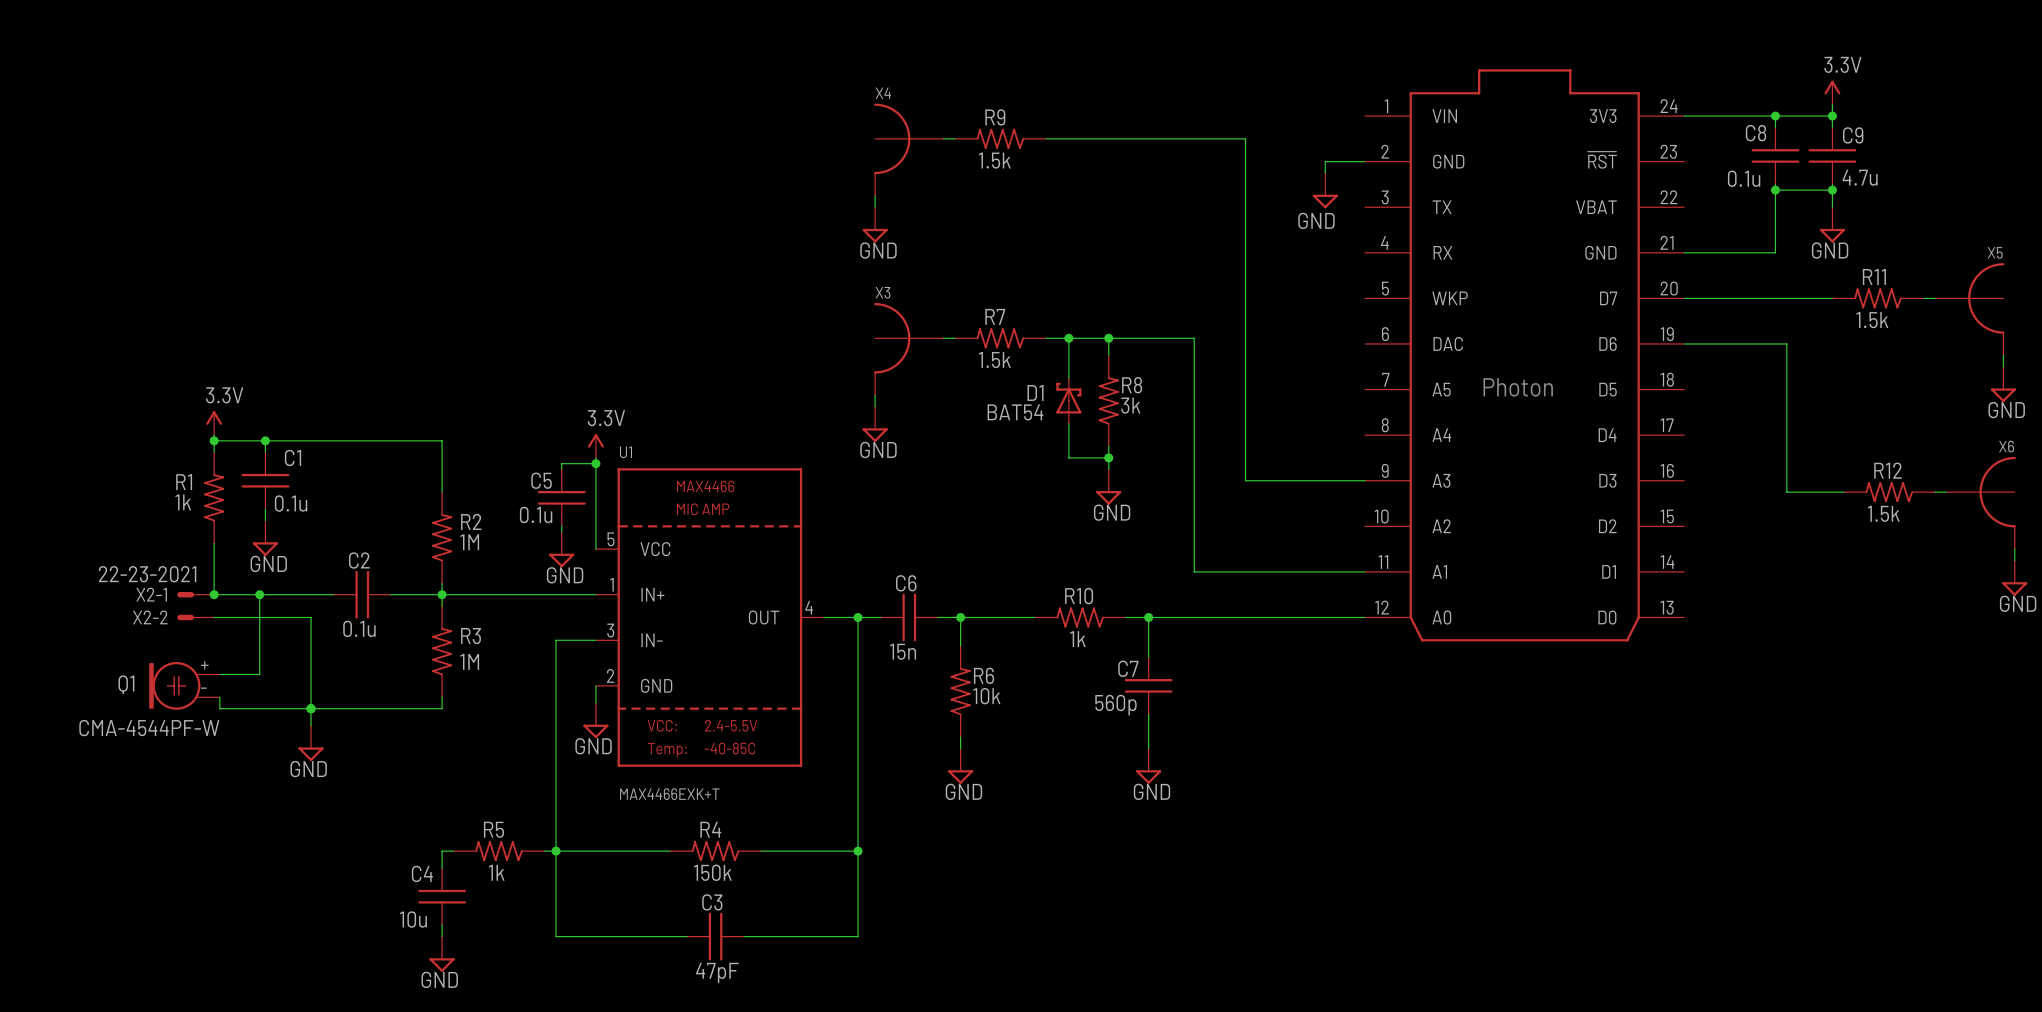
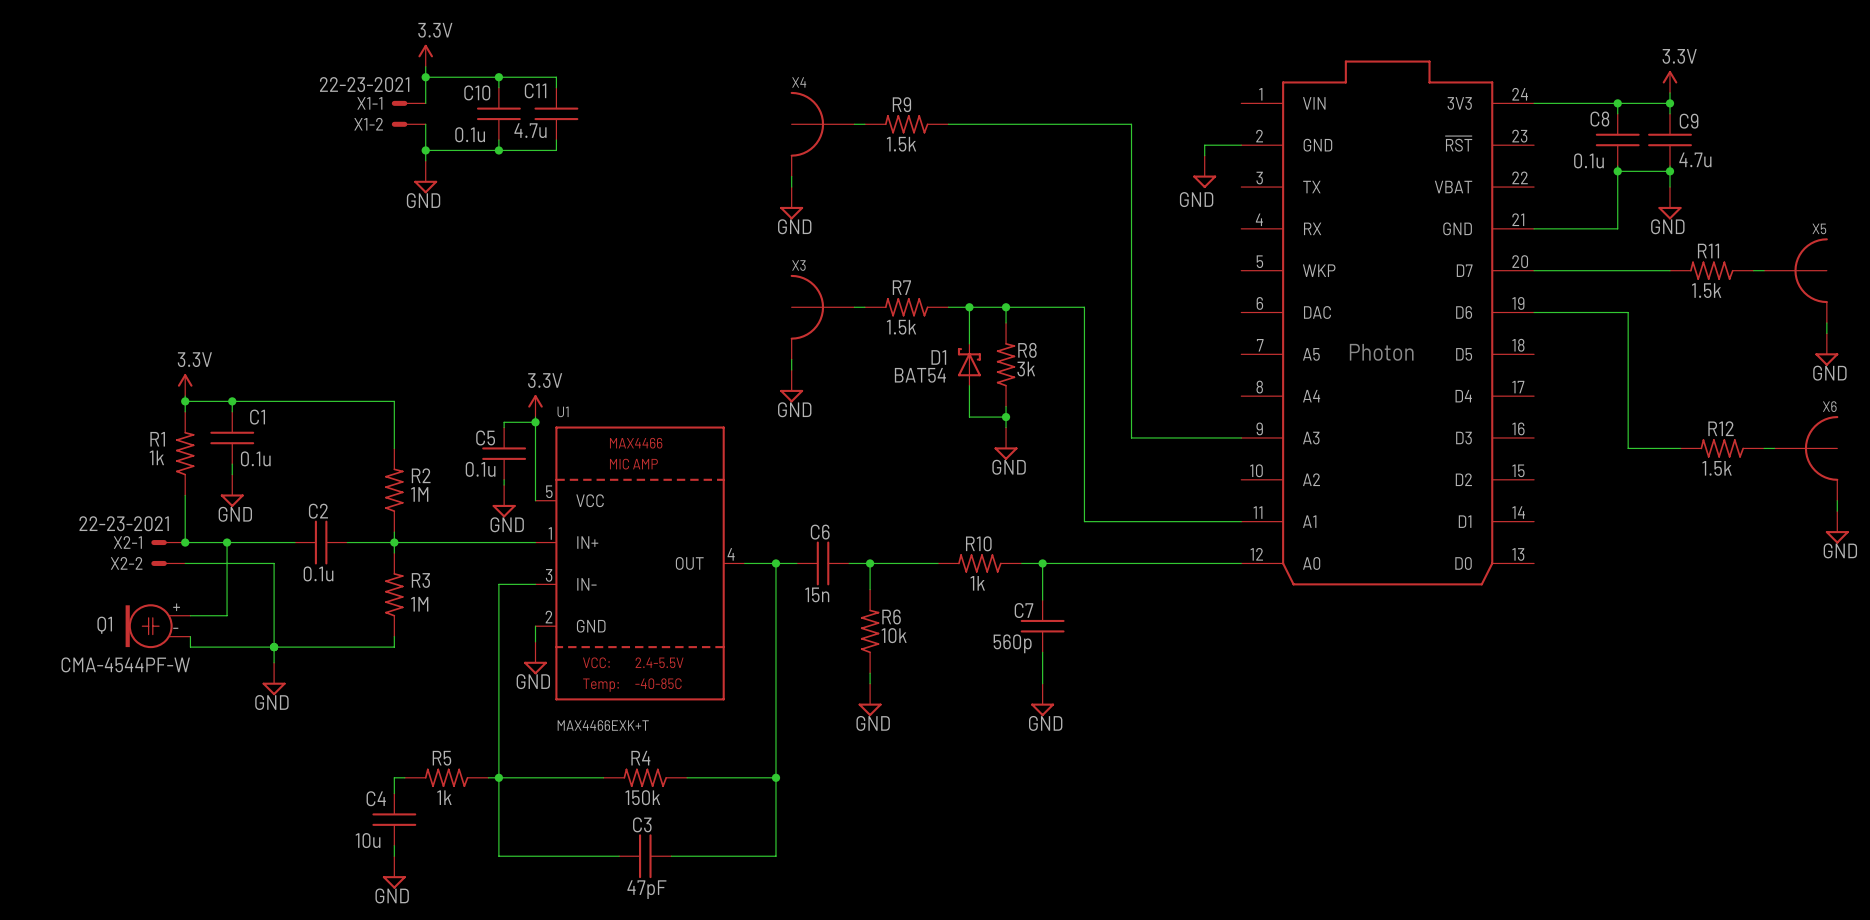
power symbol: none -> 3.3V (425, 55)
wire: none -> (425, 66) (425, 103)
wire: none -> (425, 77) (556, 77) (556, 87)
junction: none -> (425, 77)
wire: none -> (498, 77) (498, 87)
junction: none -> (498, 77)
X1-1: none -> 22-23-2021 (408, 103)
C10: none -> 0.1u (498, 113)
C11: none -> 4.7u (556, 113)
X1-2: none -> (408, 124)
wire: none -> (425, 124) (425, 160)
wire: none -> (498, 139) (498, 150)
wire: none -> (556, 139) (556, 150) (425, 150)
junction: none -> (425, 150)
junction: none -> (498, 150)
power symbol: none -> GND (425, 177)

